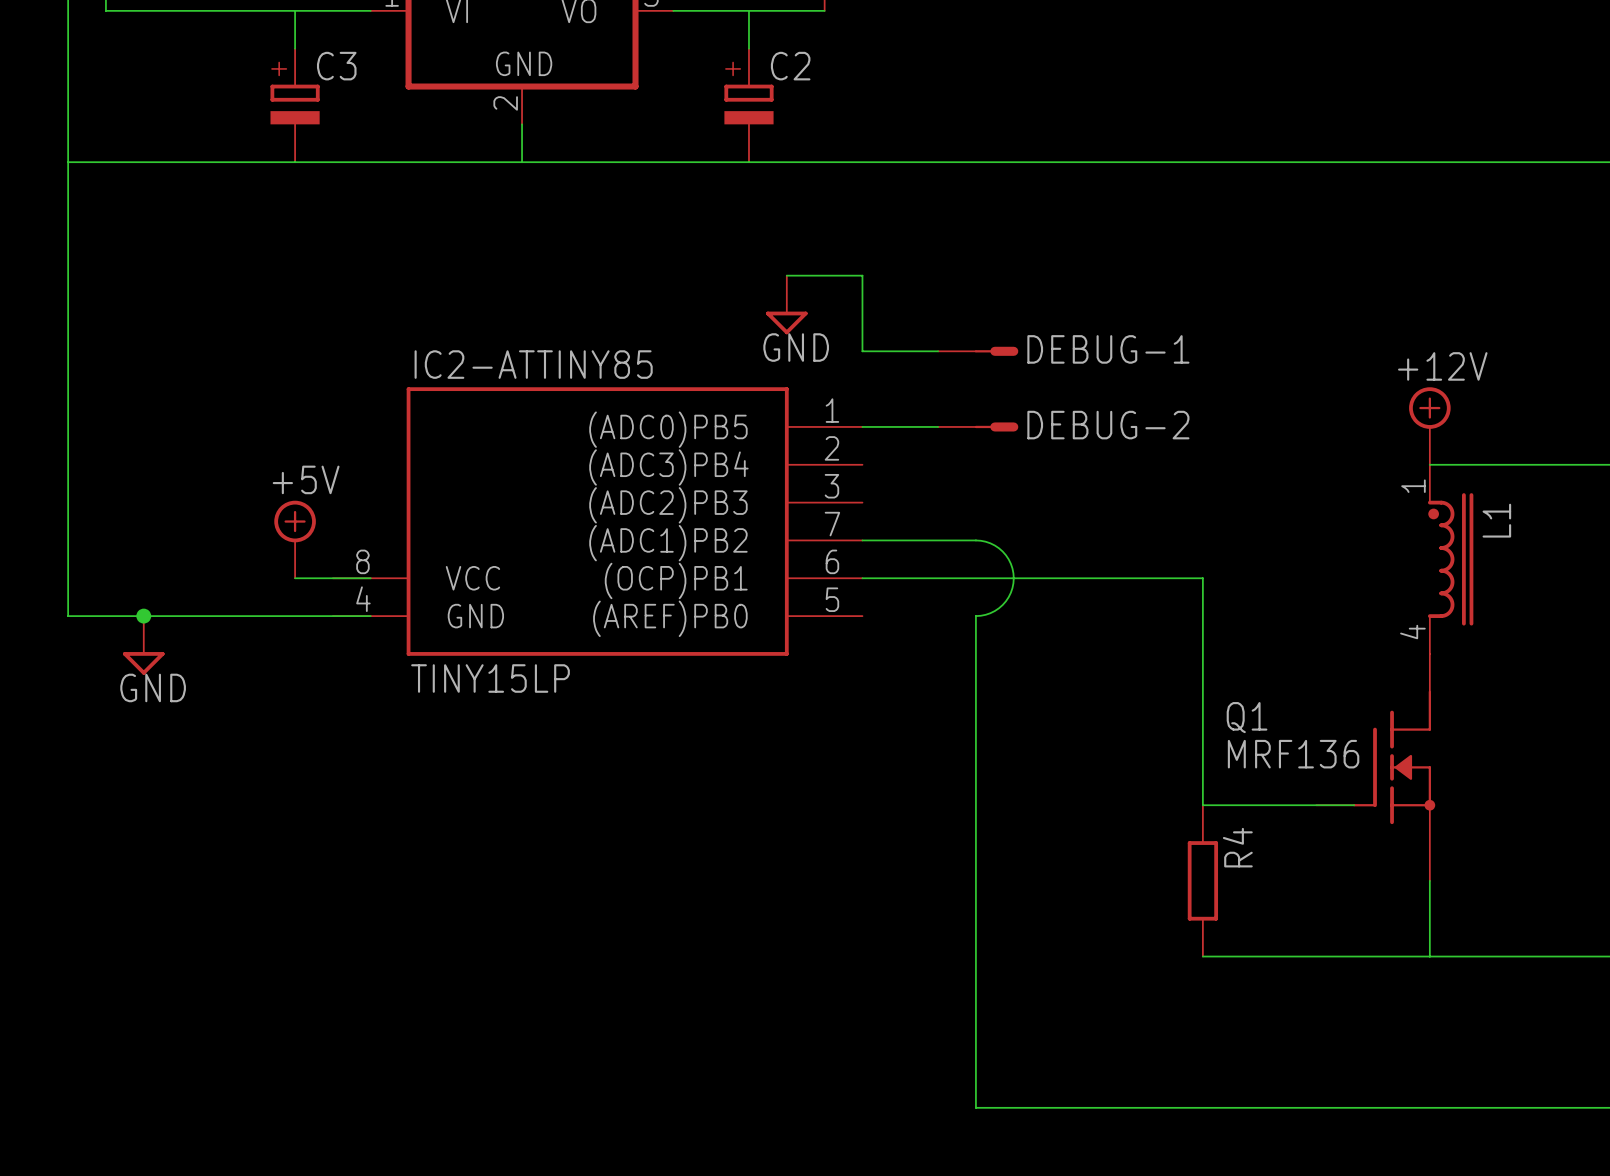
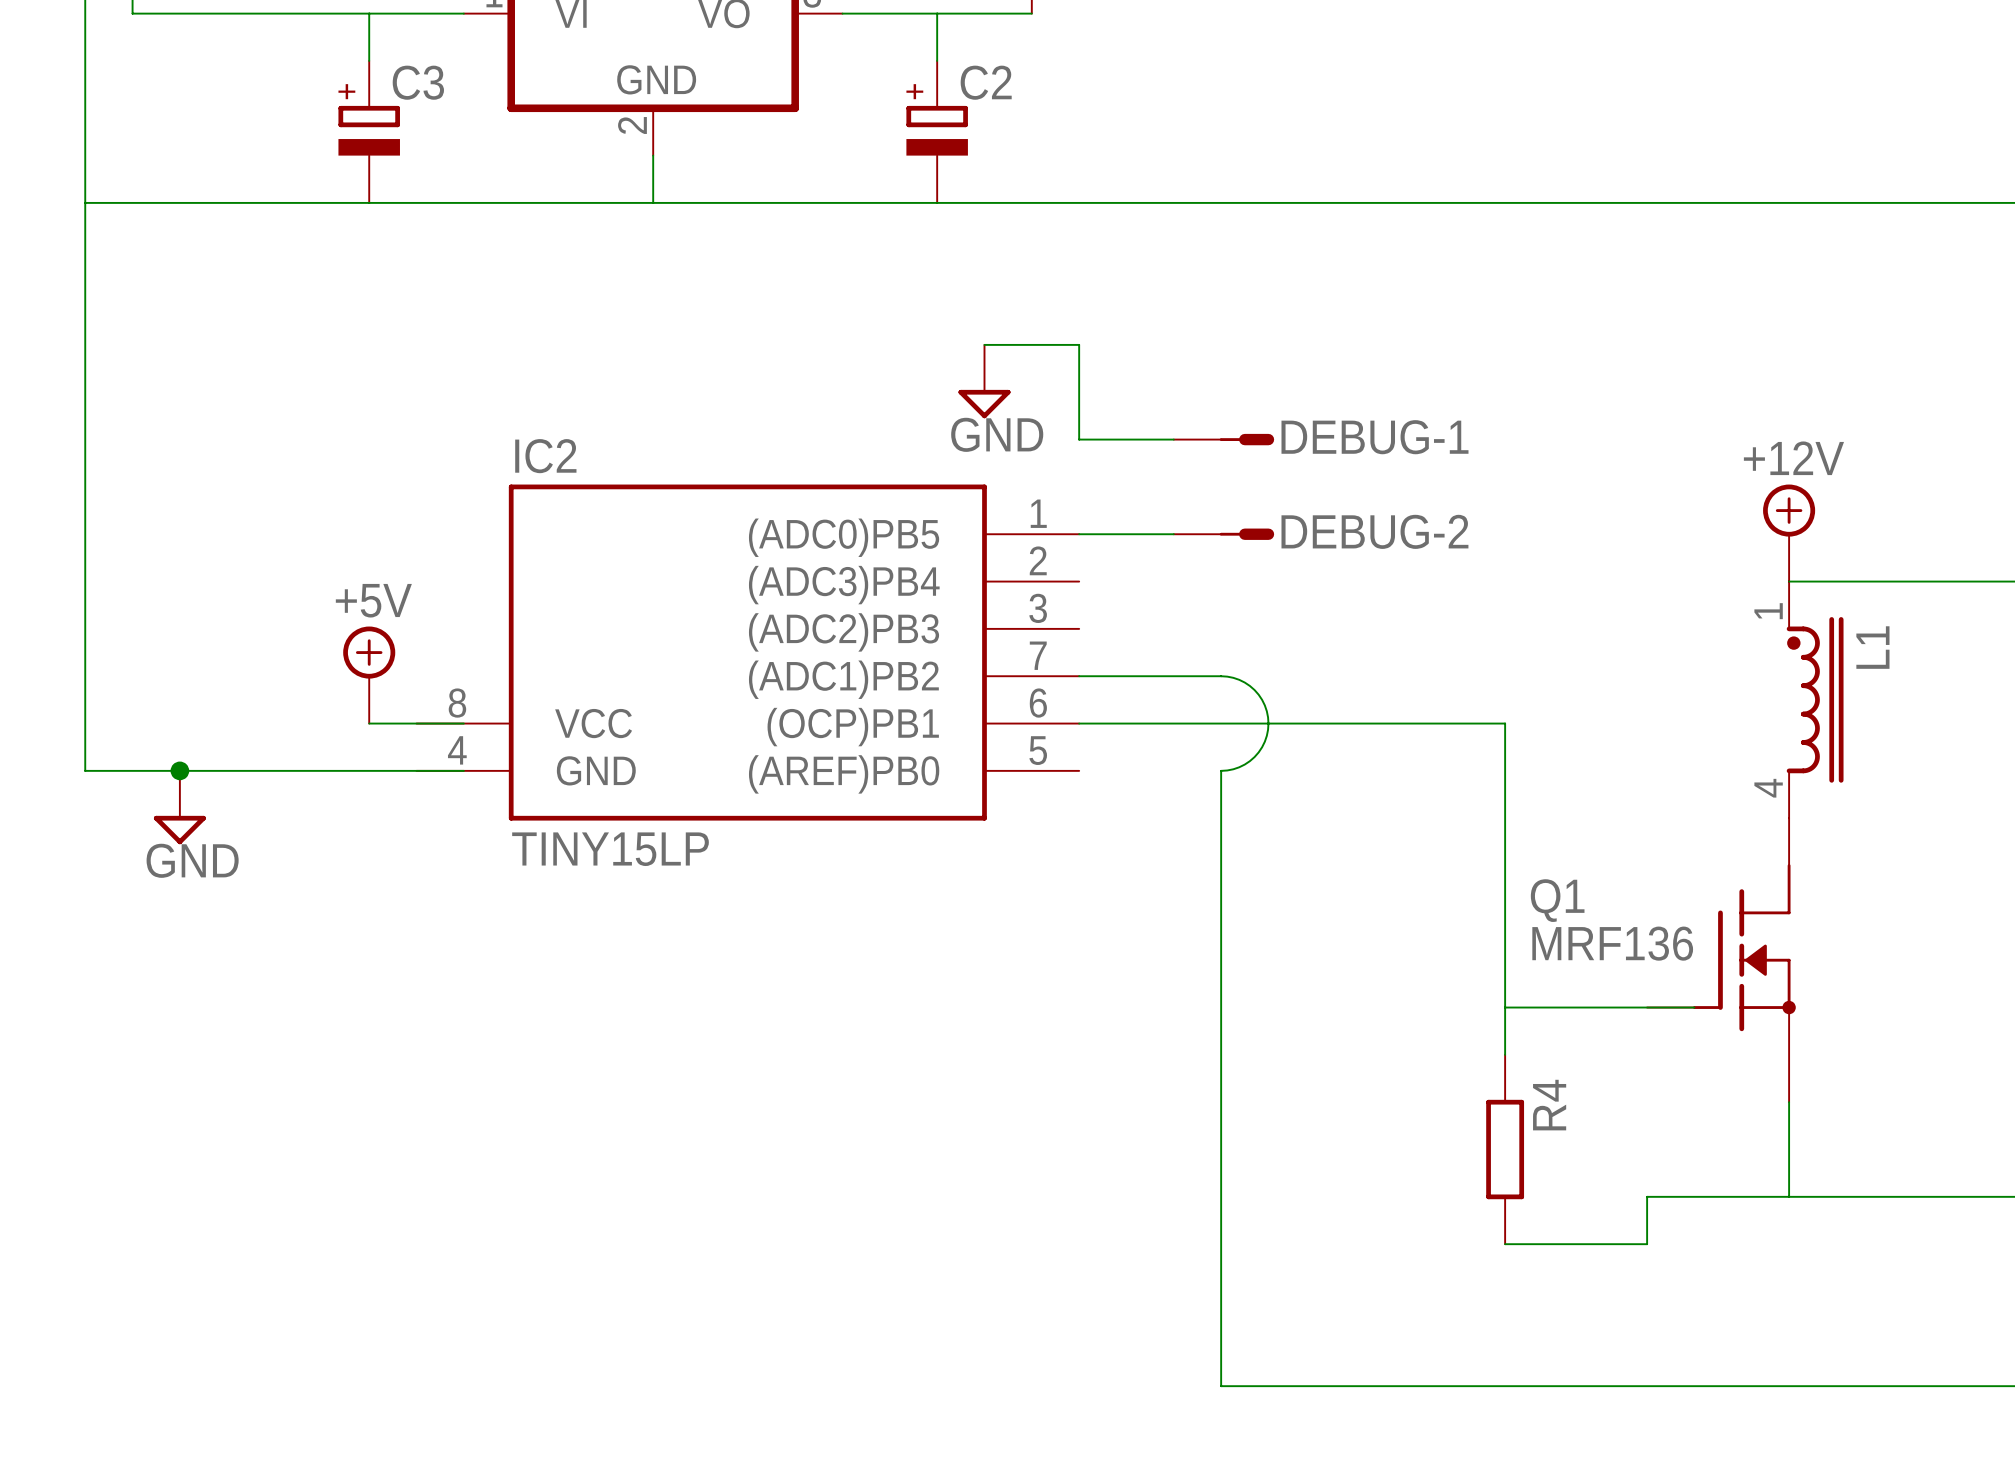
IC2-ATTINY85 name: IC2-ATTINY85 (533, 364) -> IC2 (545, 456)
R4 position: (1202, 880) -> (1505, 1149)
wire: (1202, 956) (1316, 956) -> (1505, 1244) (1647, 1244) (1647, 1196)

